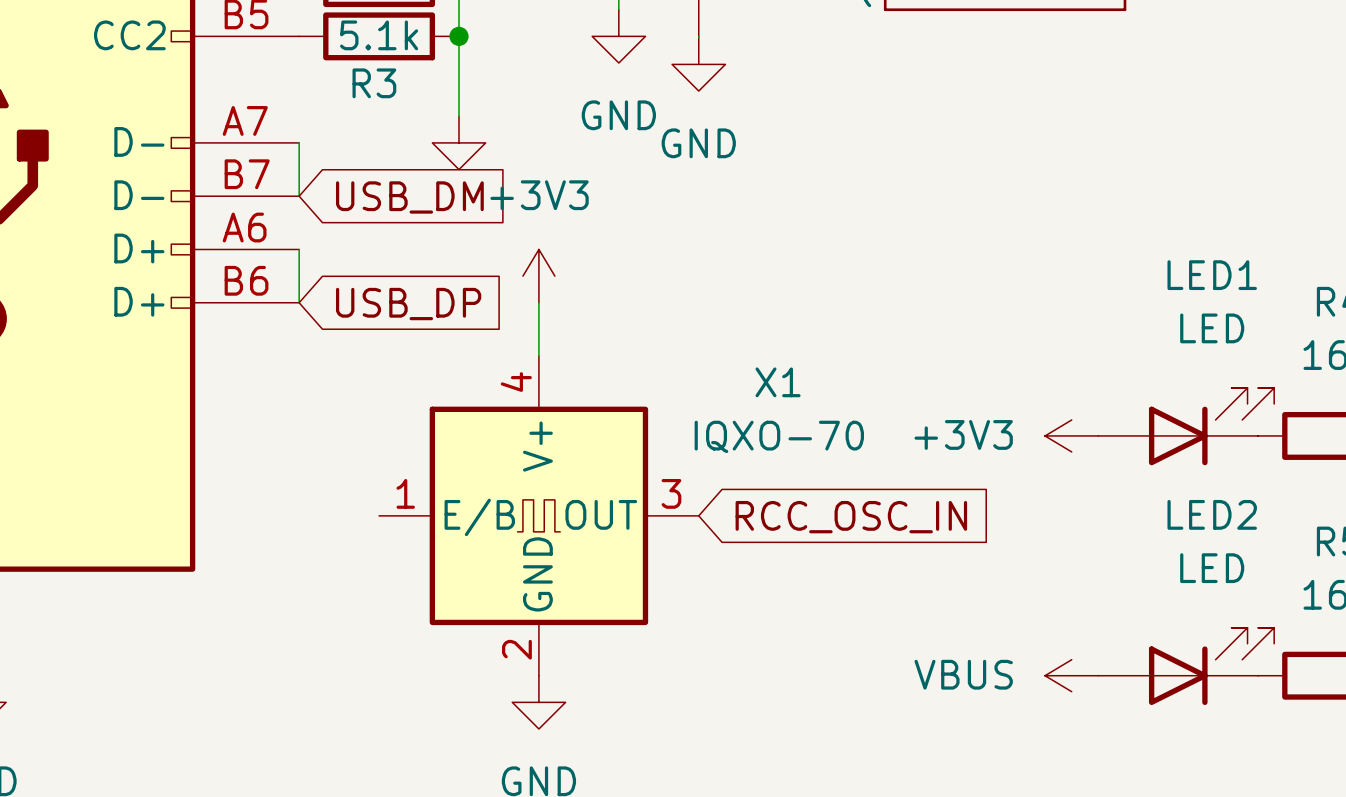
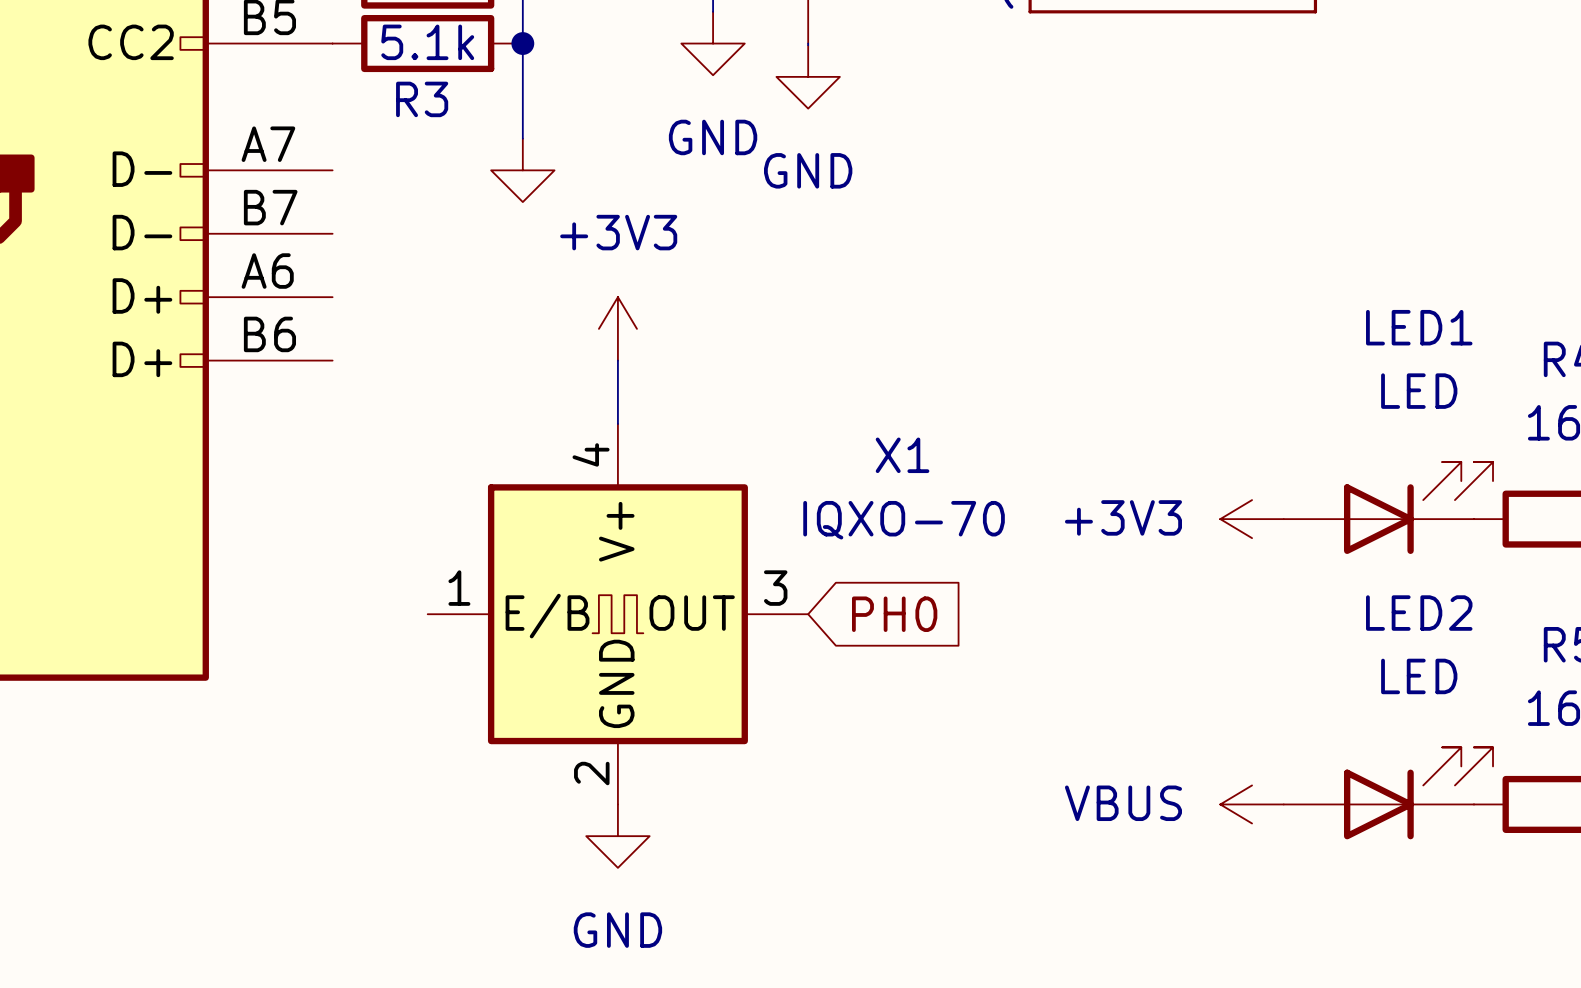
wire: (299, 142) (299, 196) -> none
global label: USB_DM (409, 197) -> none
wire: (299, 249) (299, 302) -> none
global label: USB_DP (408, 304) -> none
global label: RCC_OSC_IN (851, 517) -> PH0 (894, 614)

